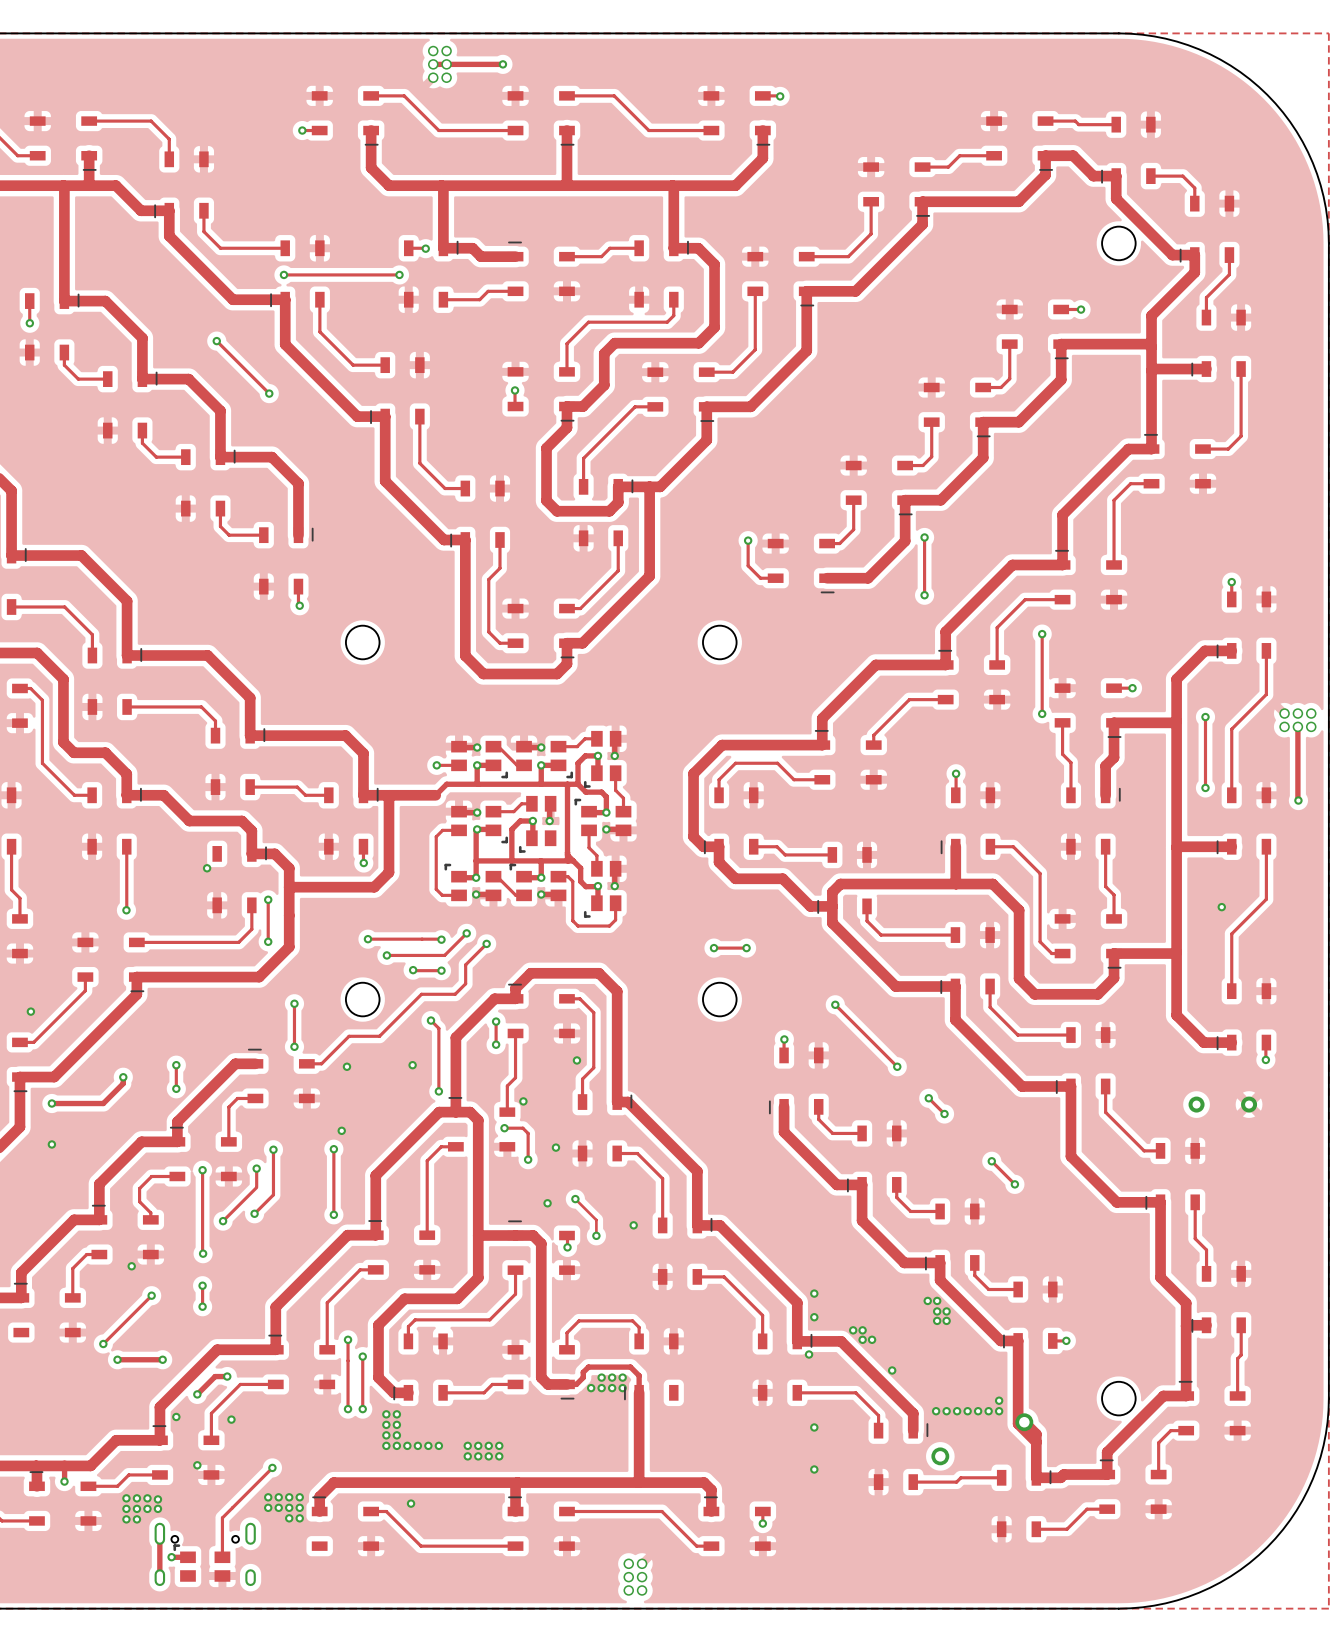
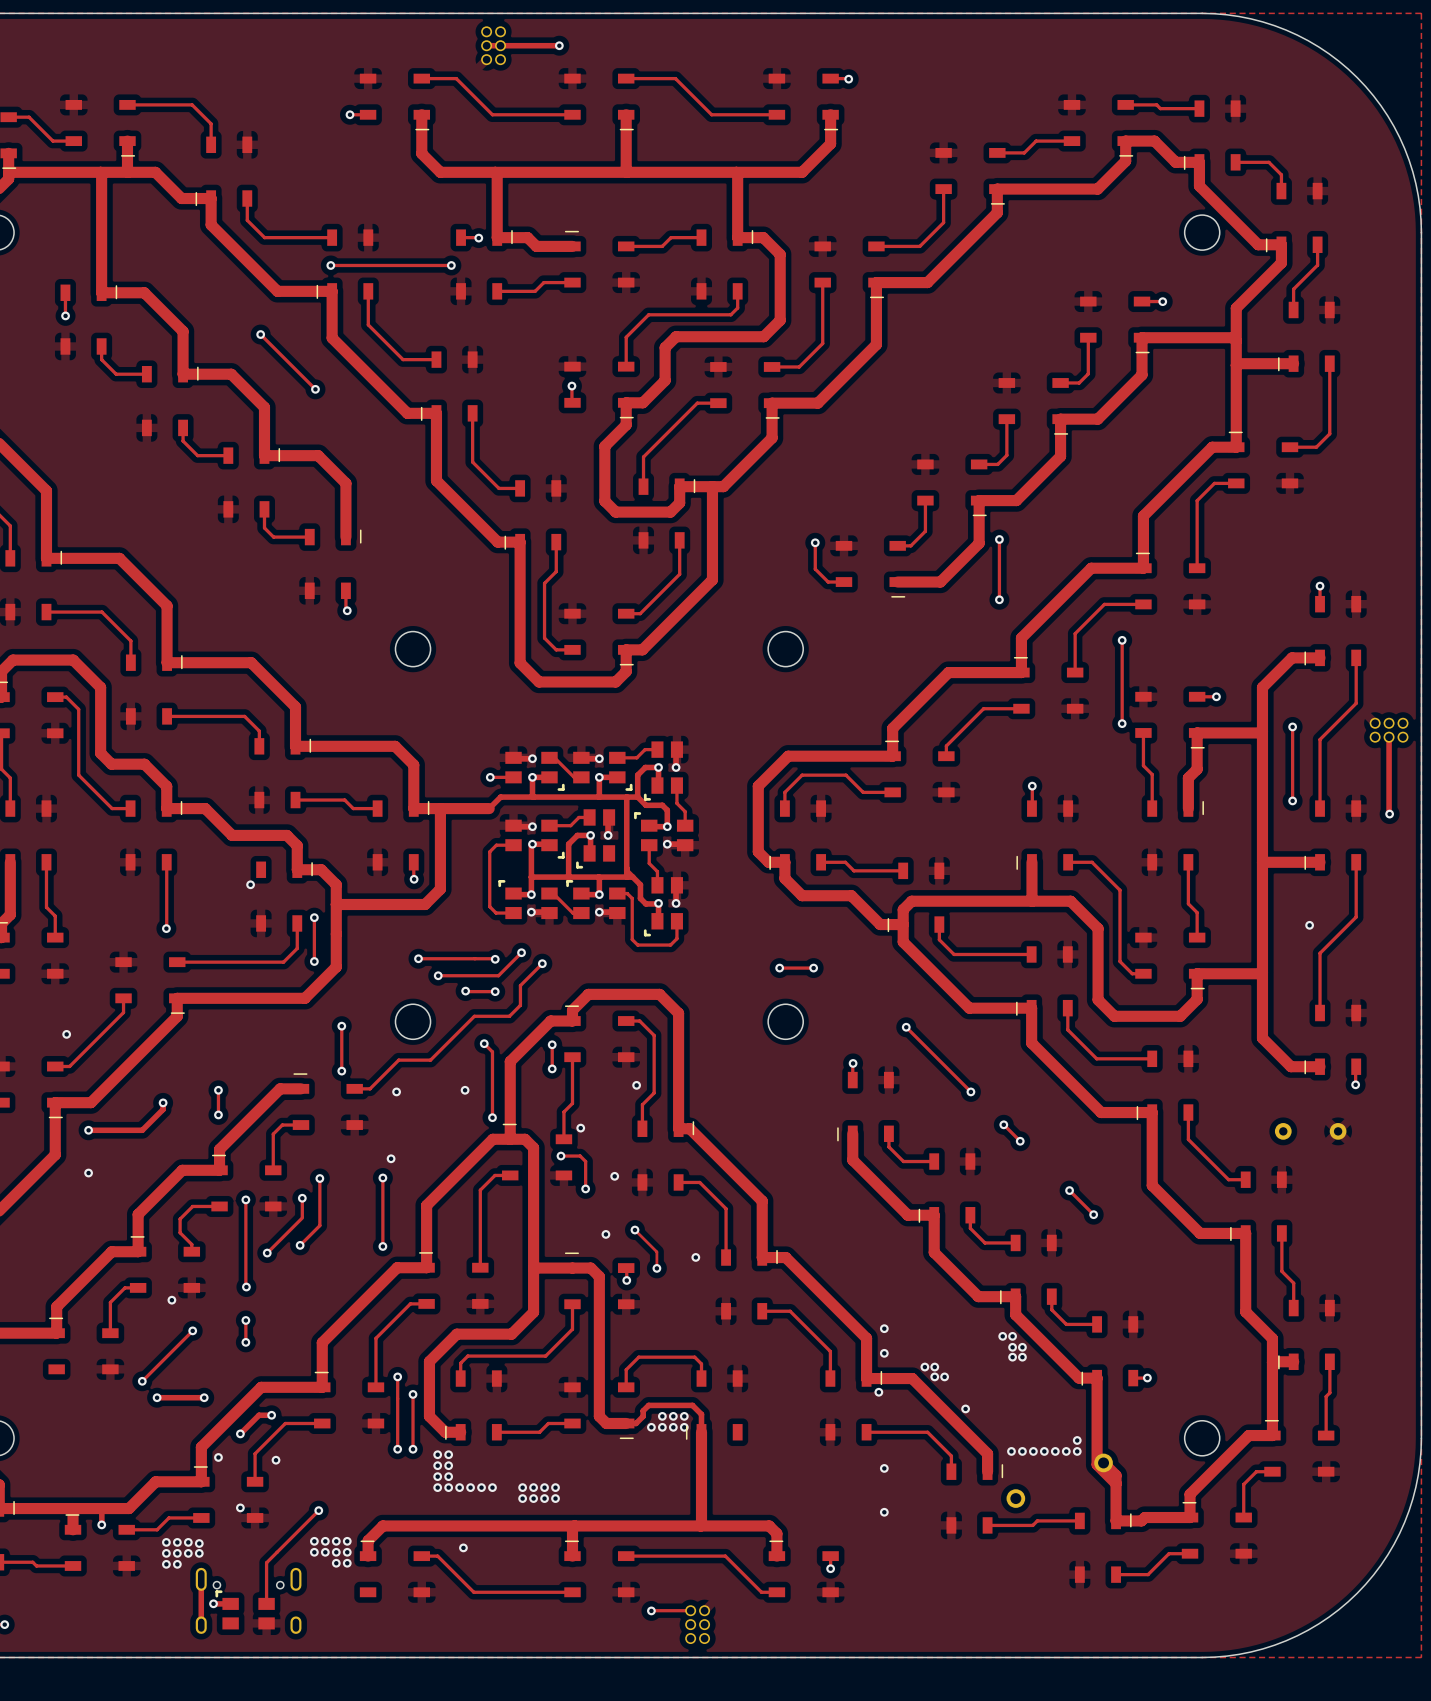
track: none -> (690, 1610) (651, 1610)
via: none -> (651, 1610)

